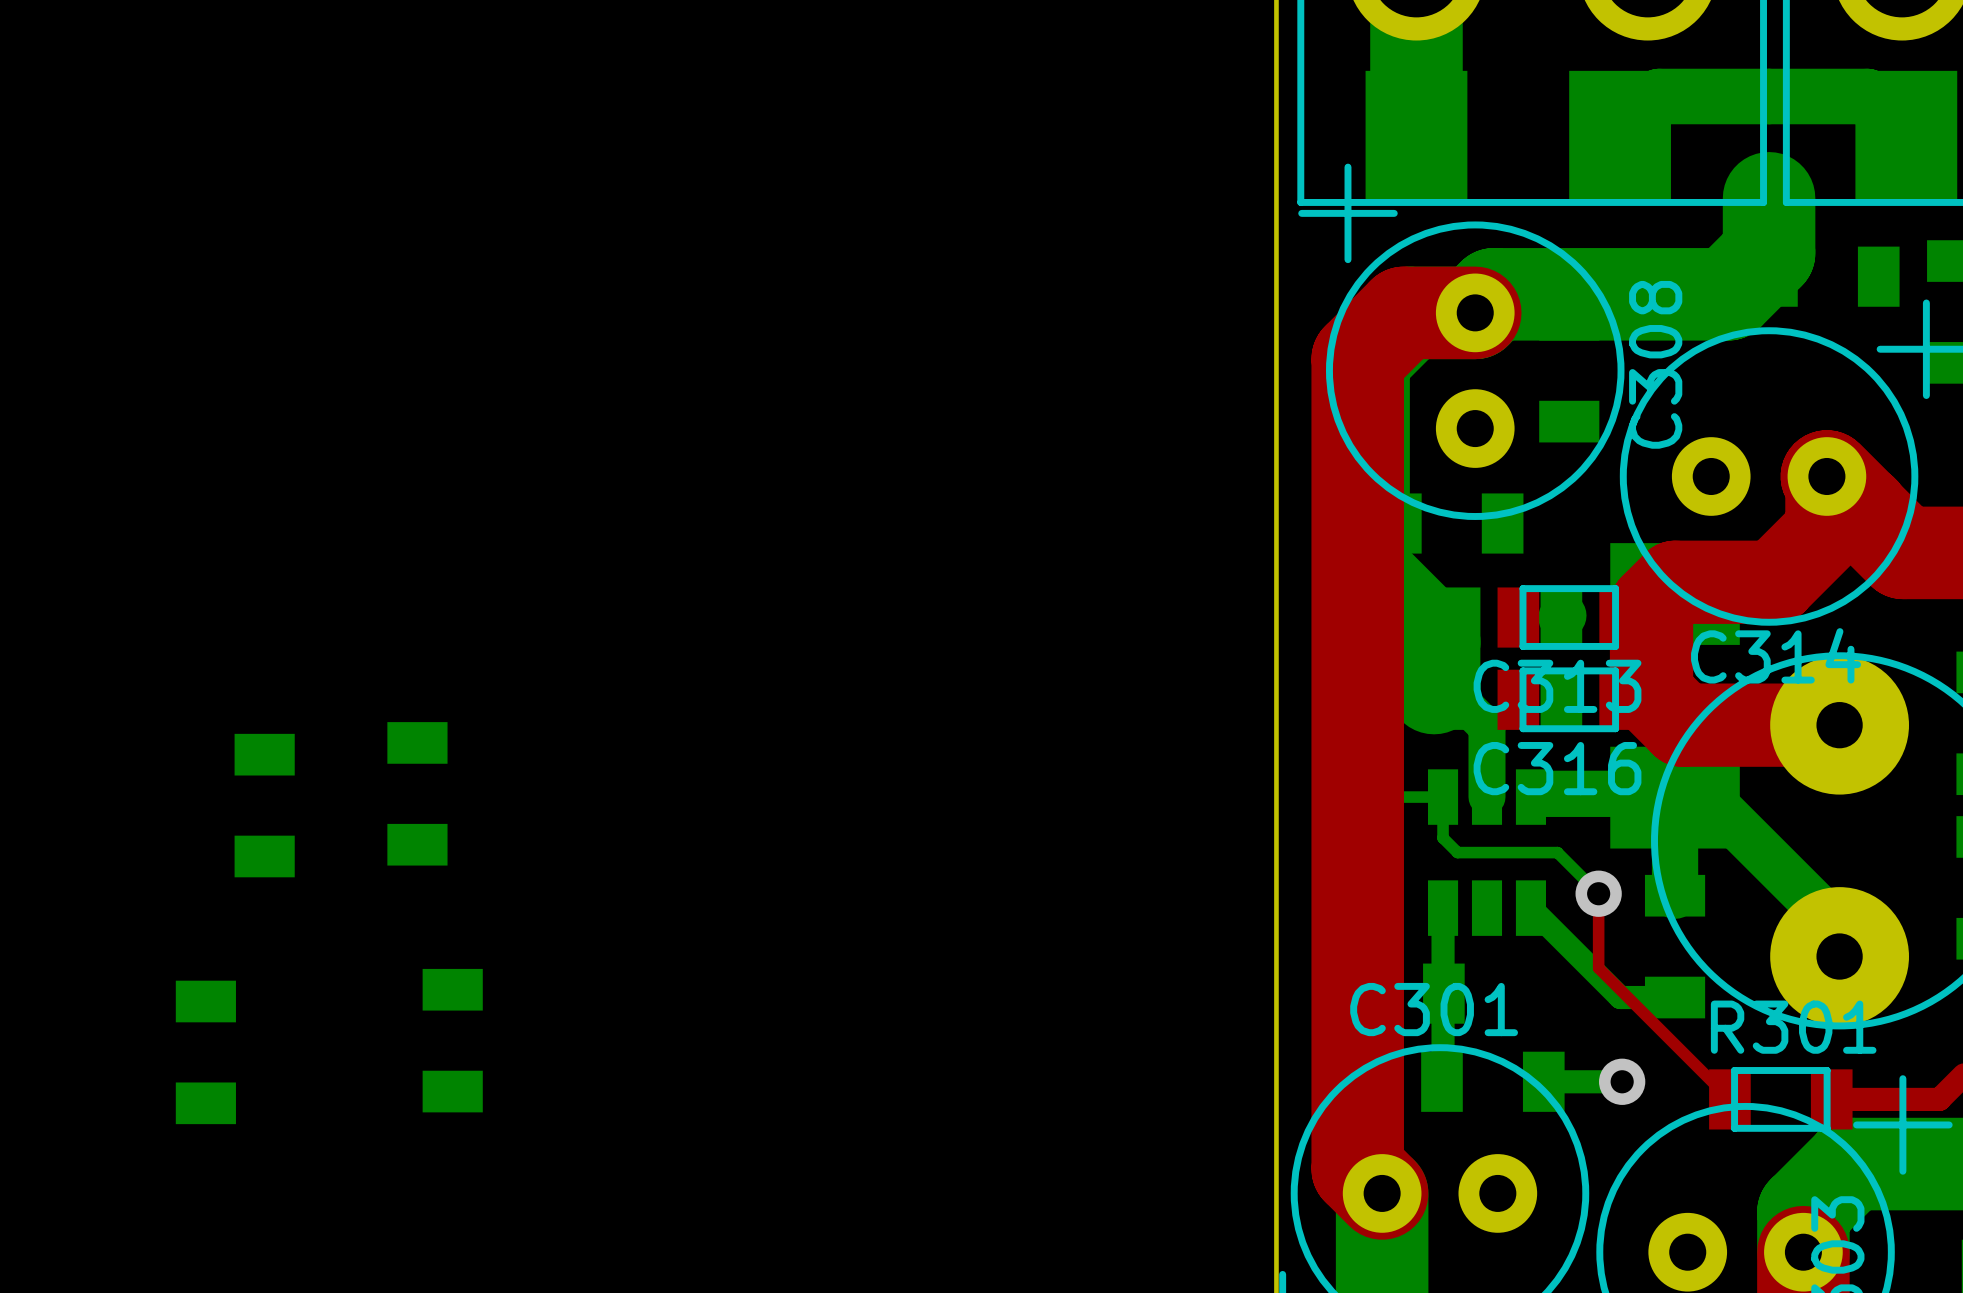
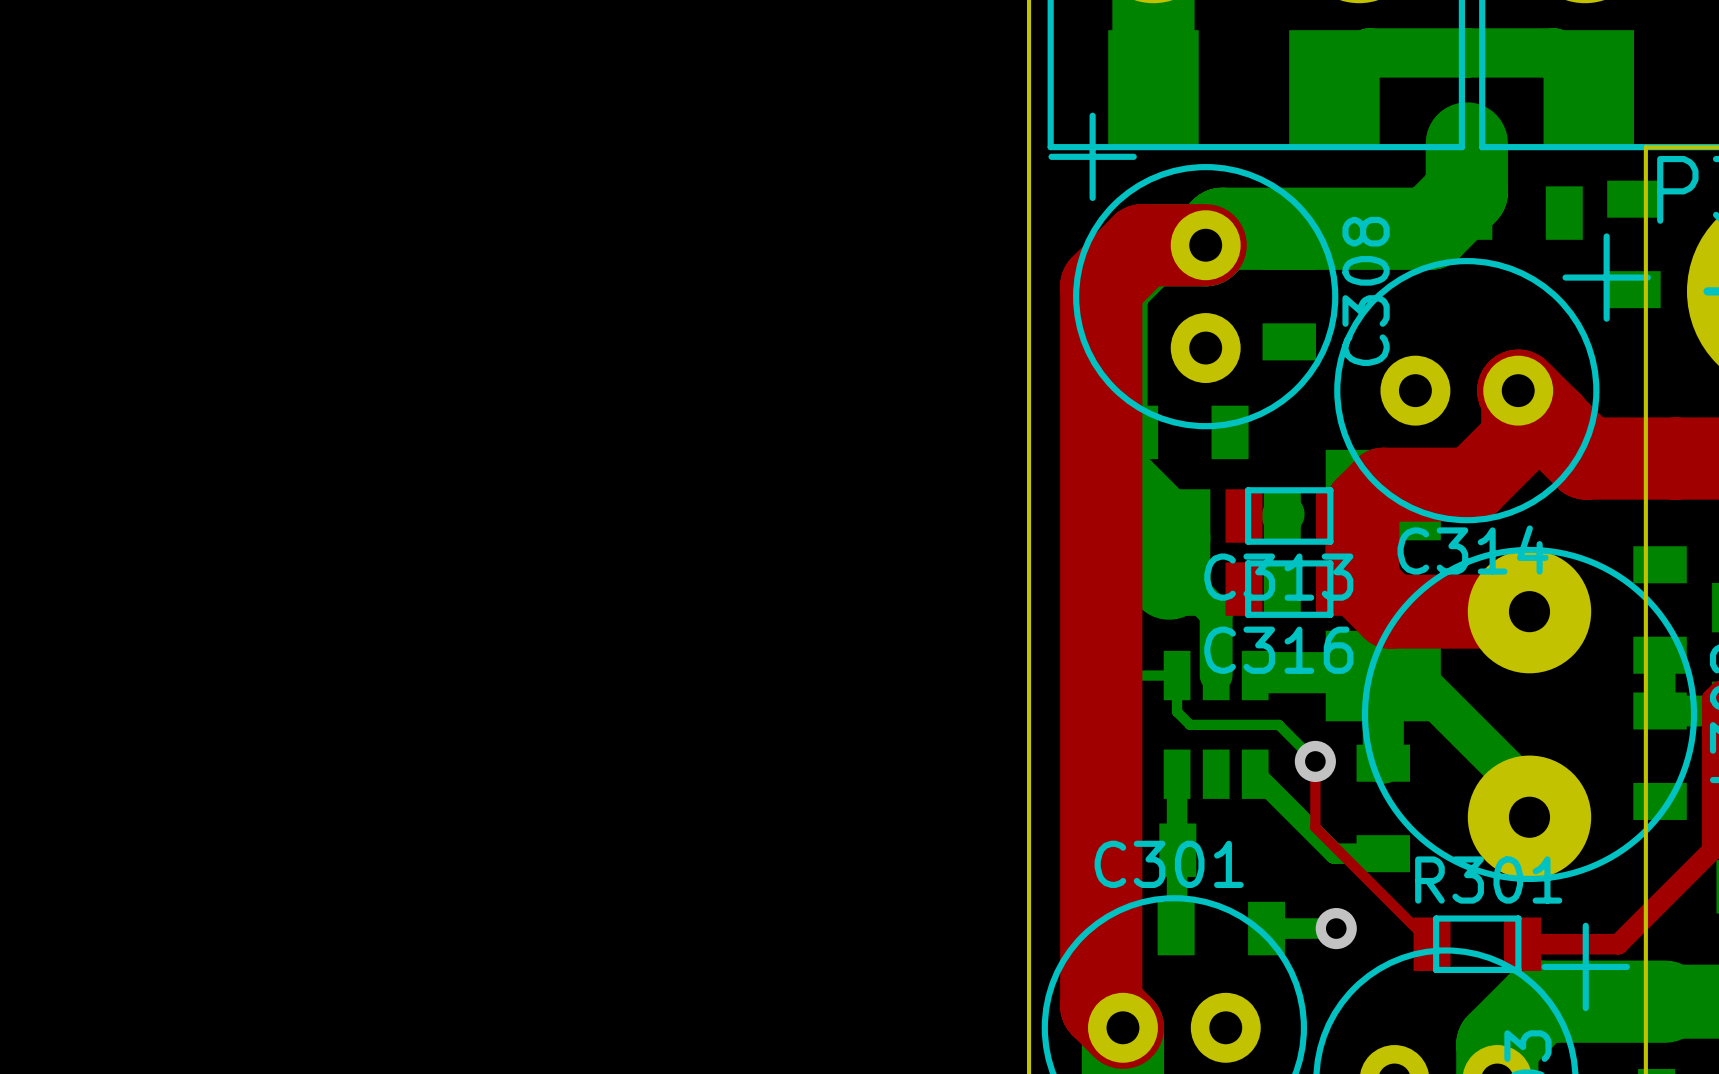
part: (417, 793) -> none
part: (264, 805) -> none
part: (452, 1040) -> none
part: (205, 1052) -> none

